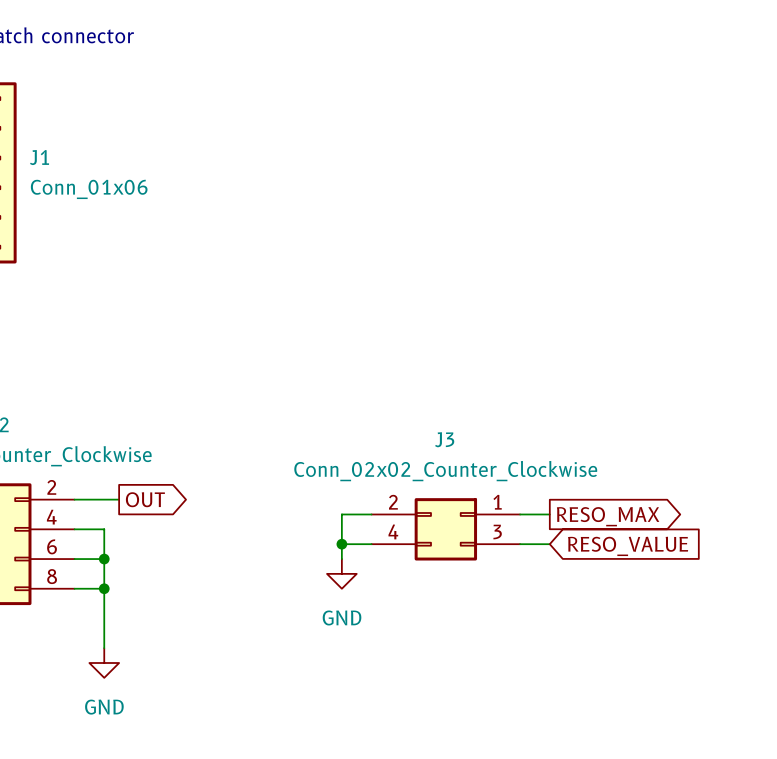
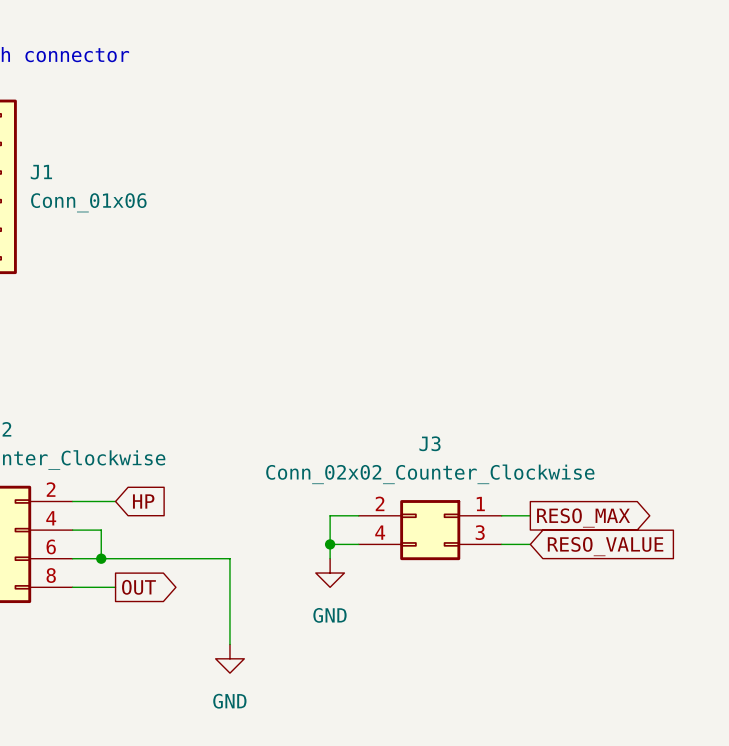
global label shape: output (145, 499) -> input (143, 501)
global label: OUT (145, 499) -> HP (143, 501)
wire: (104, 559) (104, 648) -> (101, 558) (229, 558) (229, 644)
wire: none -> (101, 587) (115, 587)
junction: (104, 588) -> none
global label: none -> OUT (138, 587)
power symbol position: GND (104, 663) -> GND (229, 658)

